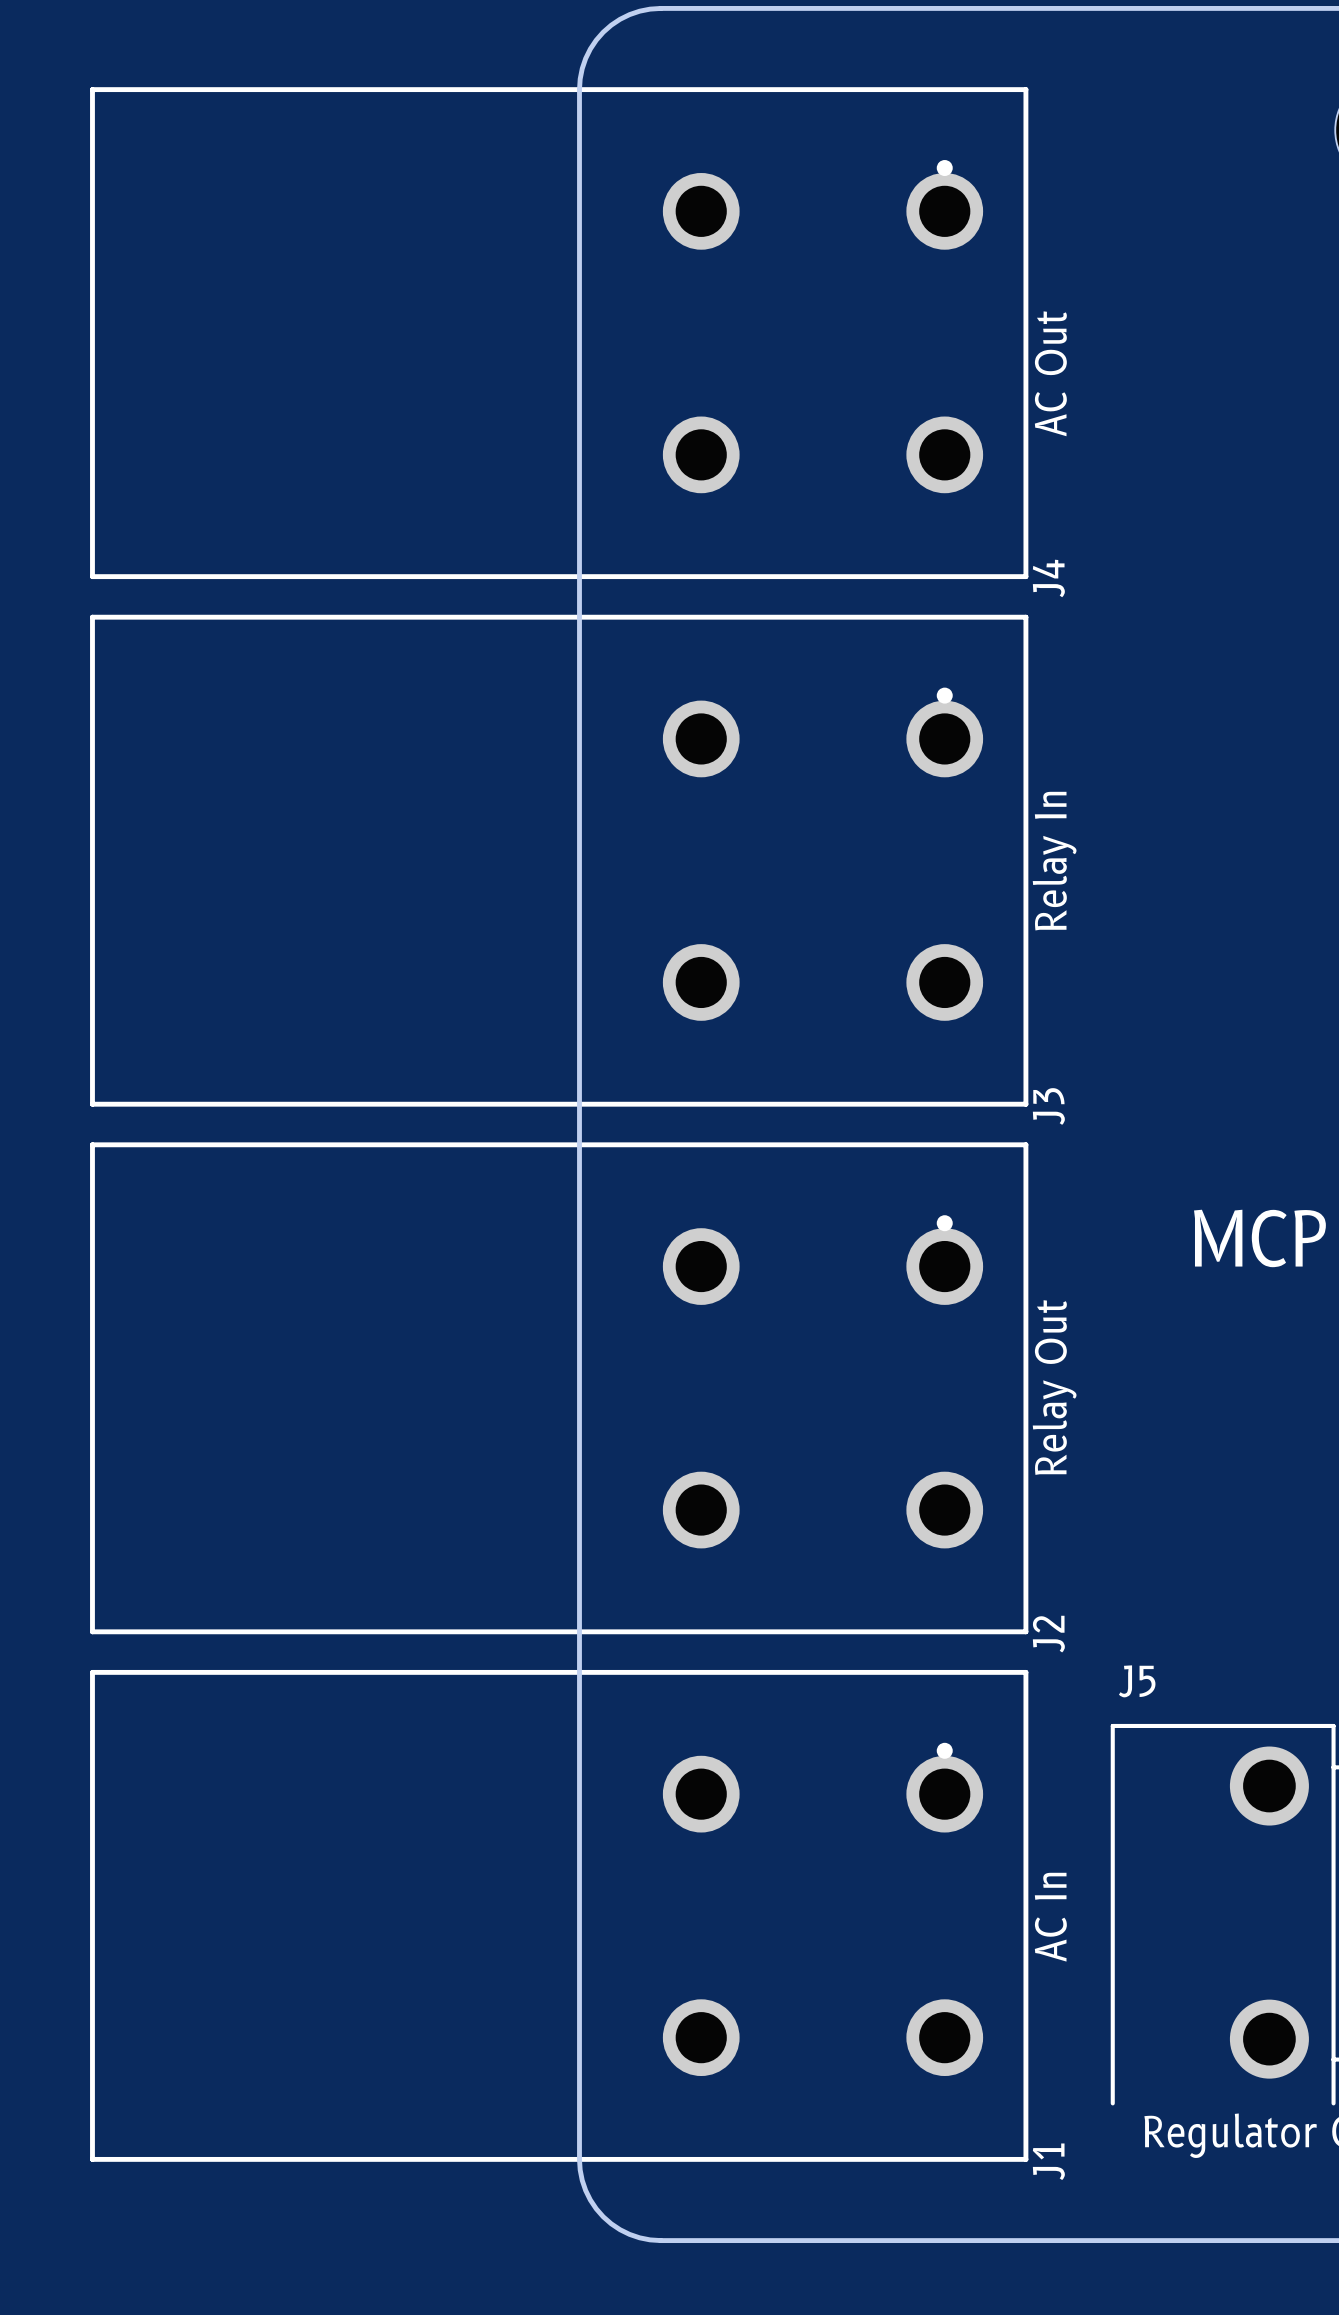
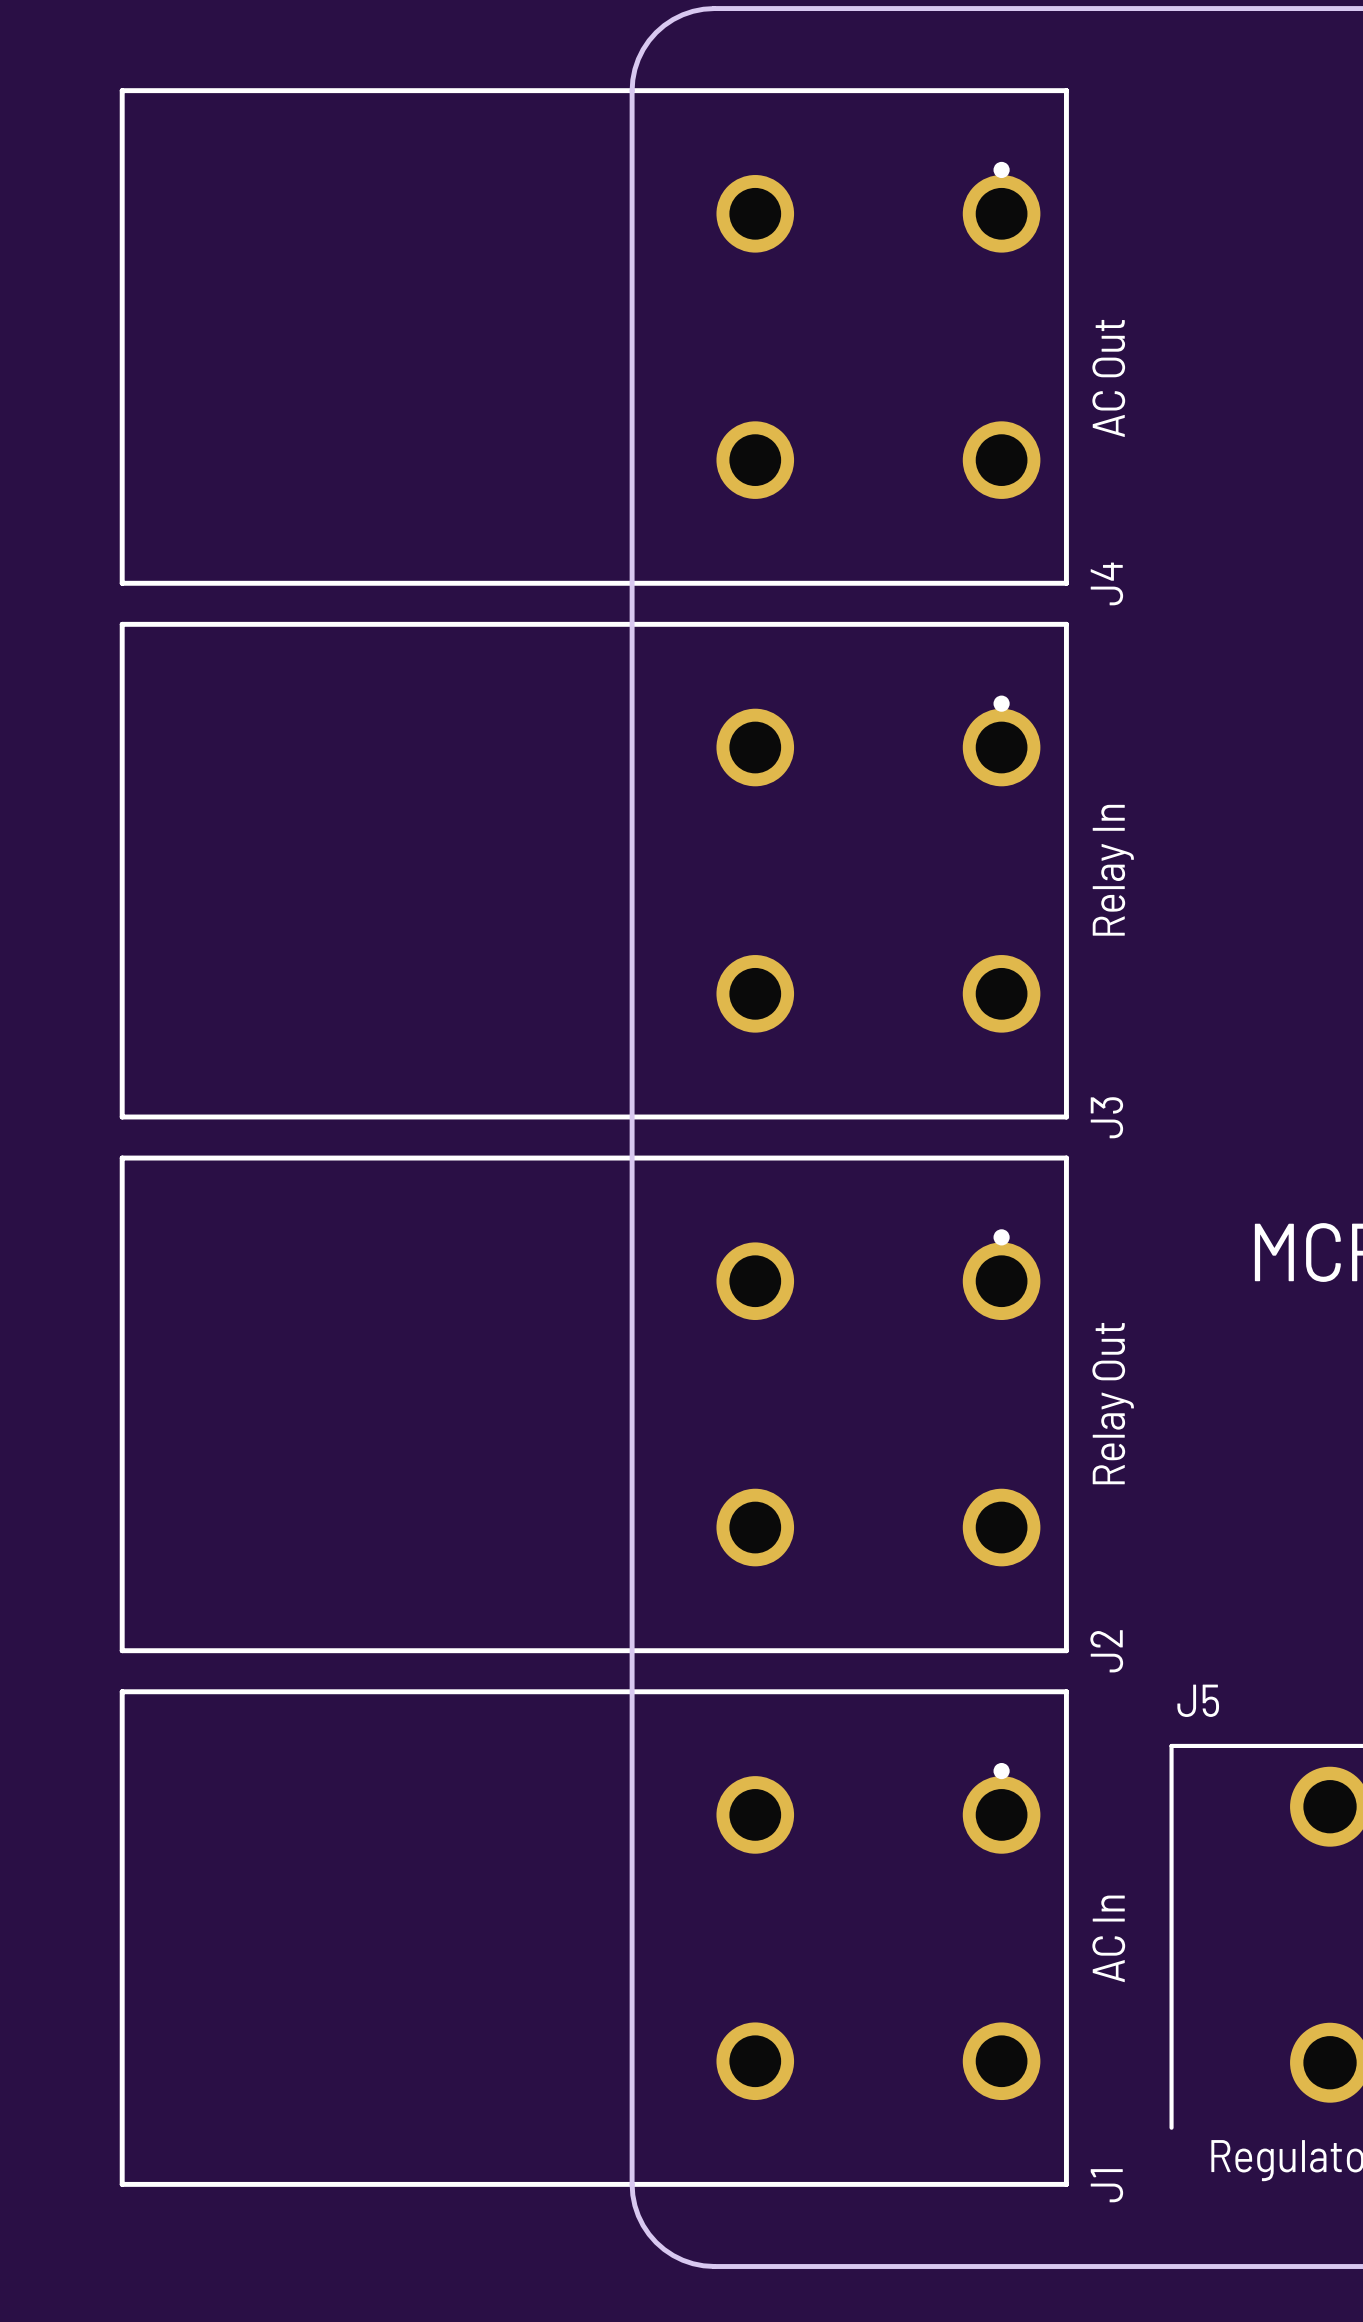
J4 footprint: [90, 87, 1029, 580] -> [119, 88, 1069, 586]
J3 footprint: [90, 614, 1029, 1107] -> [119, 621, 1069, 1120]
J2 footprint: [90, 1142, 1029, 1635] -> [119, 1155, 1069, 1654]
J1 footprint: [90, 1669, 1029, 2162] -> [119, 1689, 1069, 2187]

